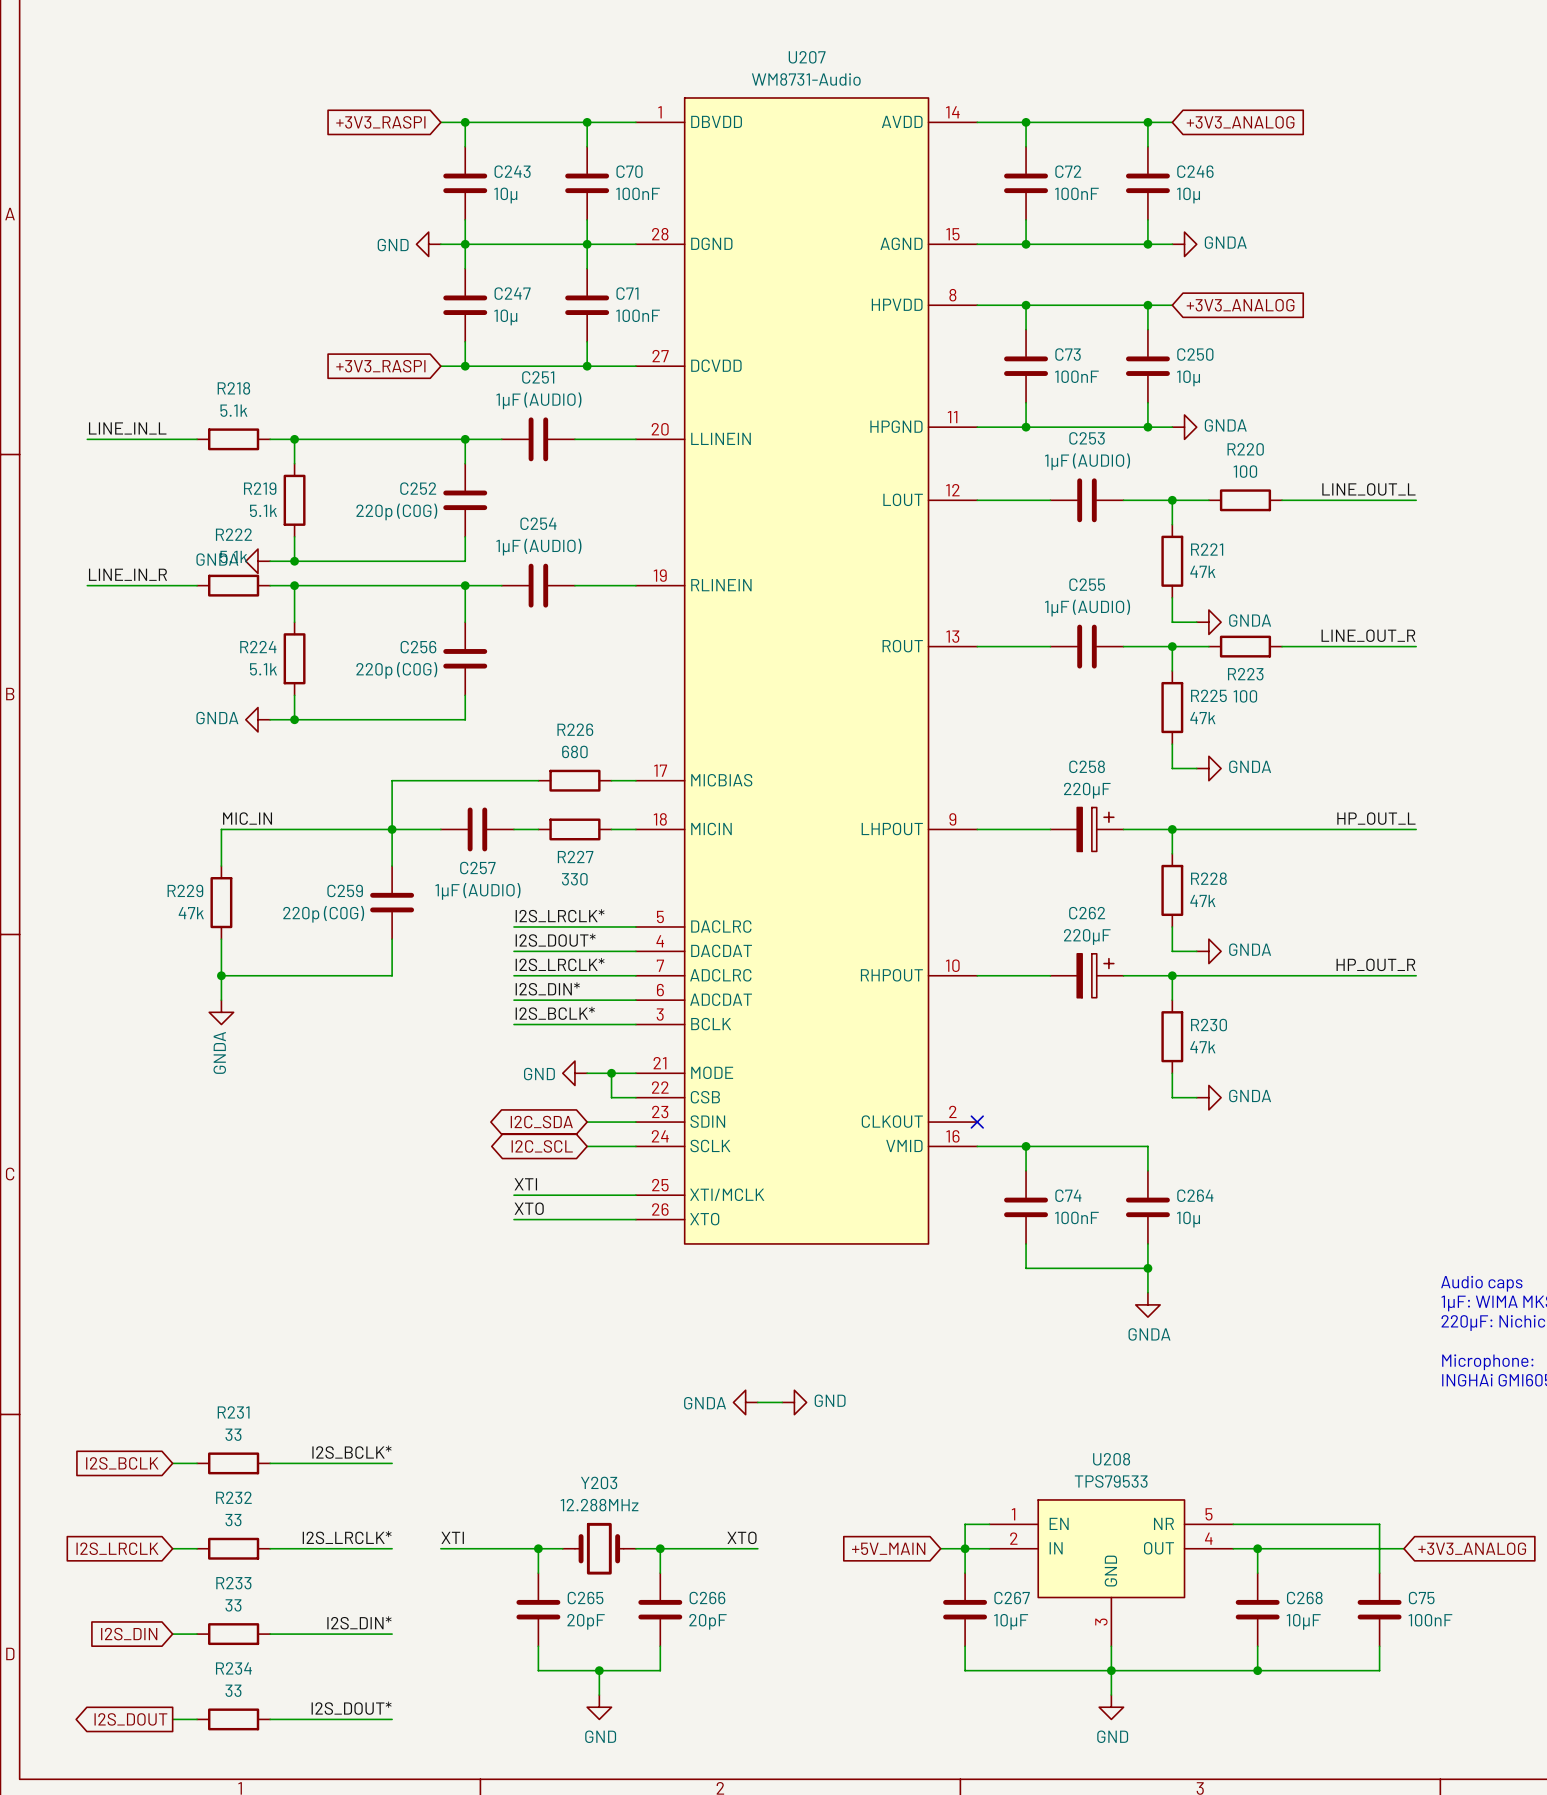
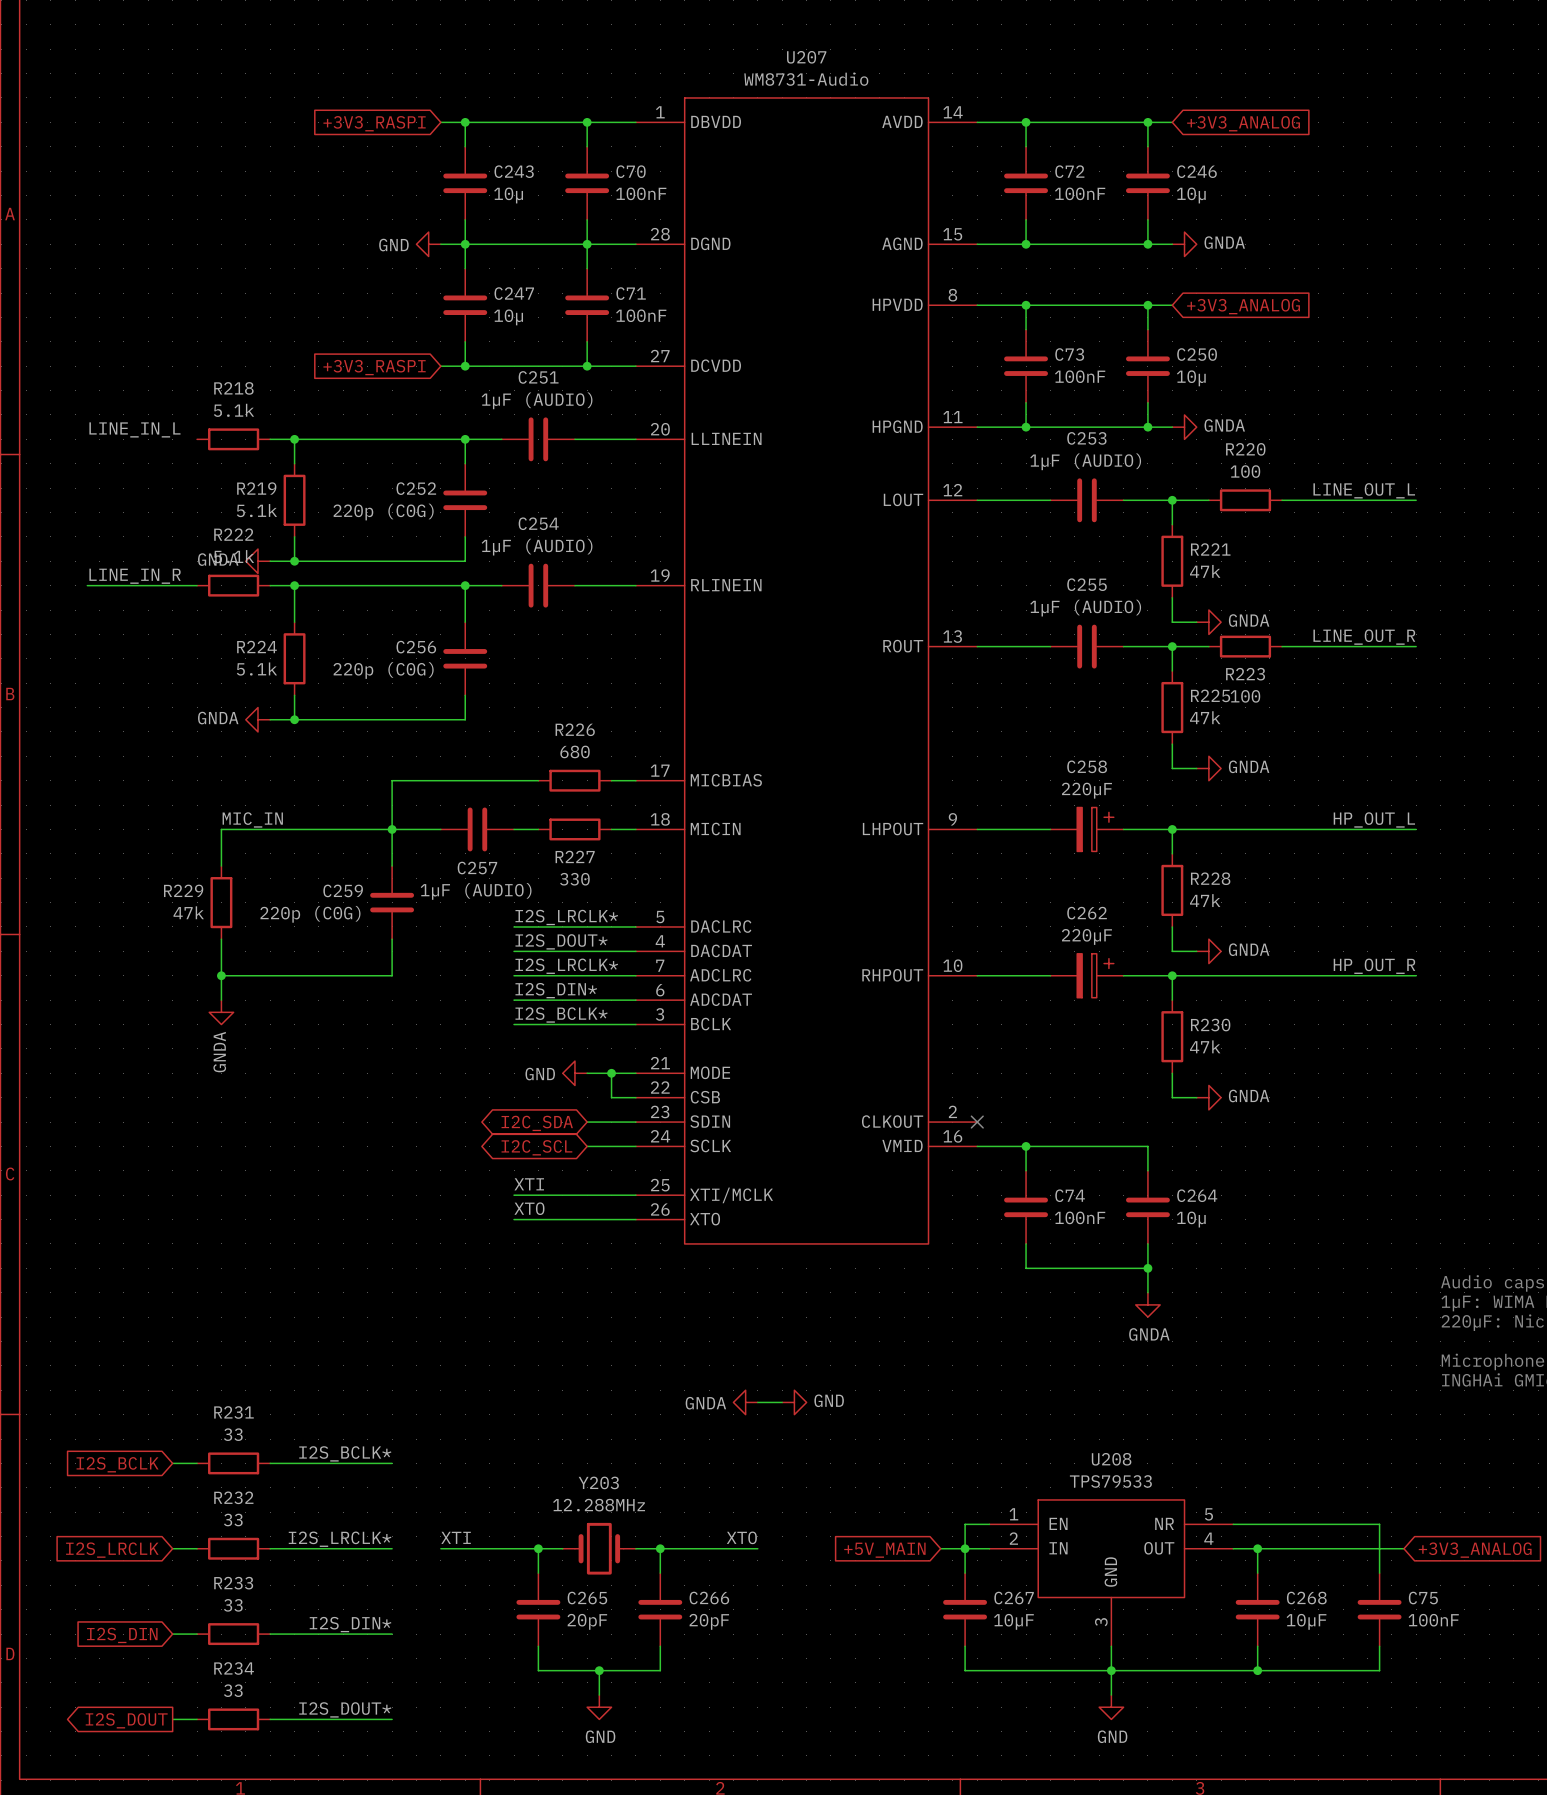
wire: (87, 439) (197, 439) -> none

